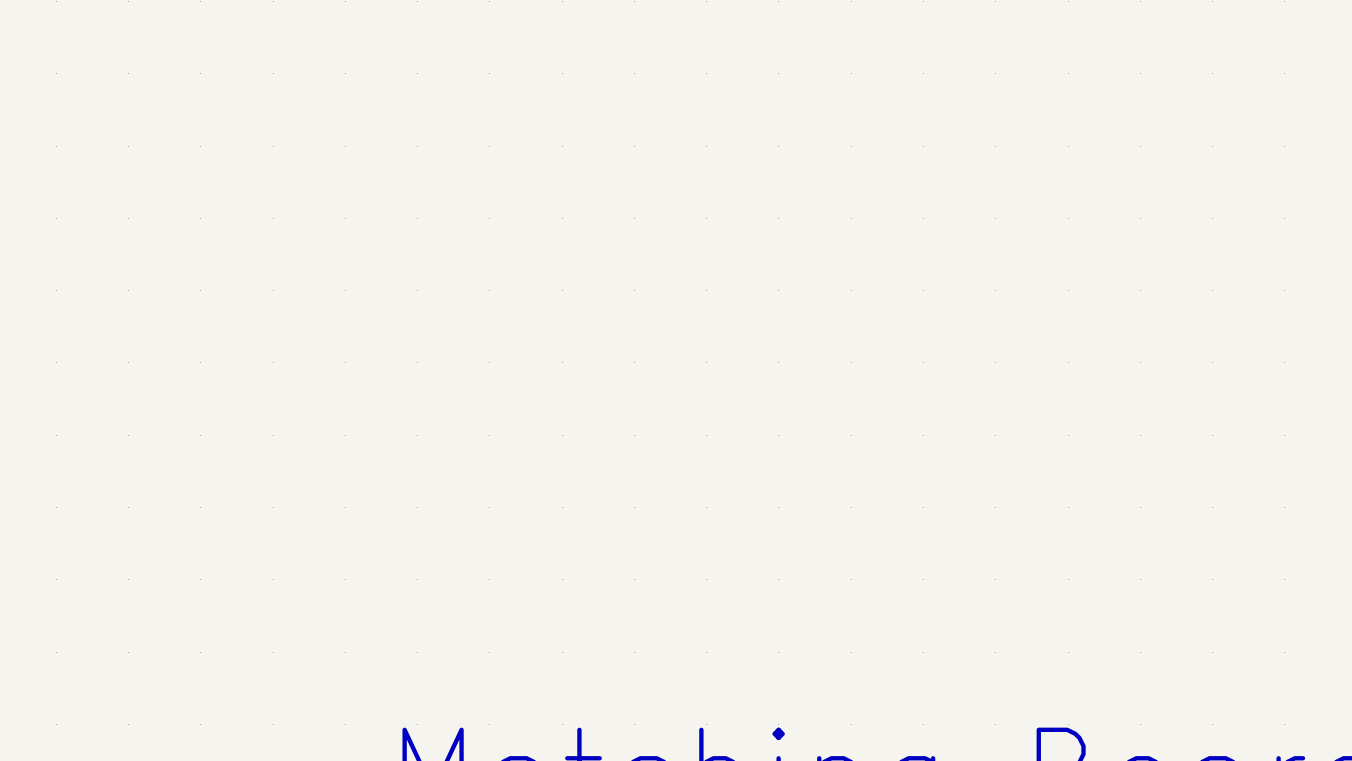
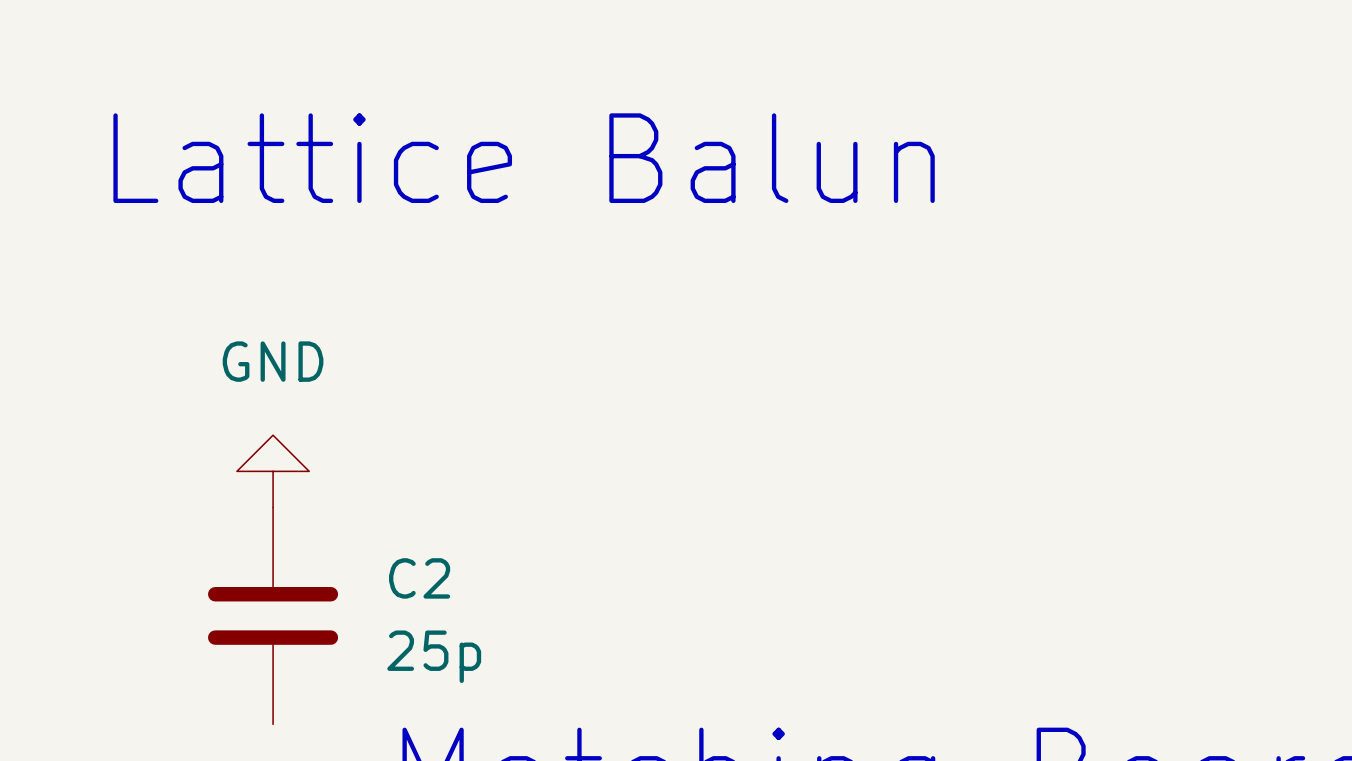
text: none -> Lattice Balun (524, 158)
power symbol: none -> GND (273, 471)
C2: none -> 25p (273, 615)

